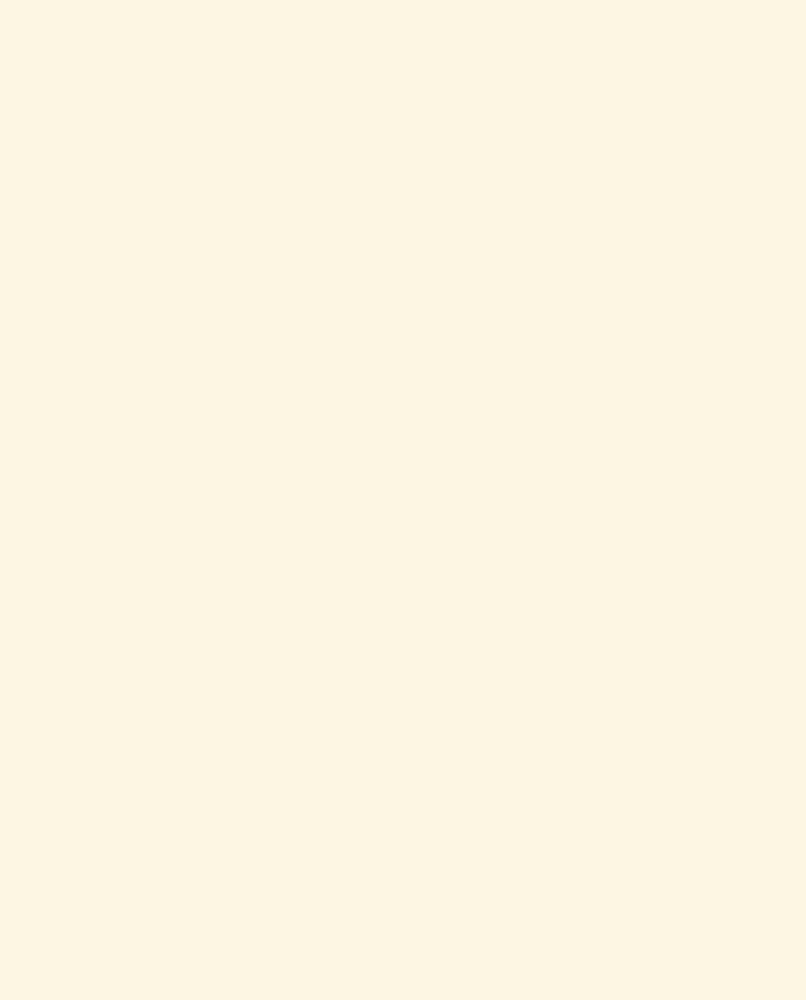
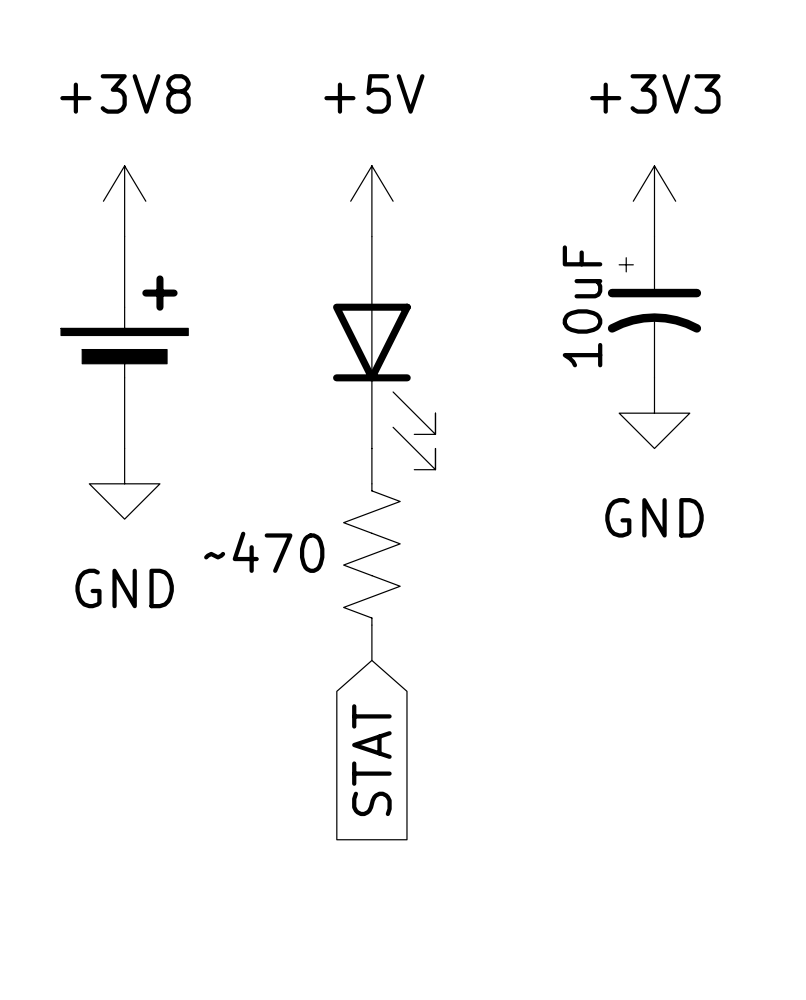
power symbol: none -> +3V8 (124, 201)
power symbol: none -> +5V (371, 201)
power symbol: none -> +3V3 (654, 201)
part: none -> (654, 307)
part: none -> (124, 342)
part: none -> (384, 353)
power symbol: none -> GND (654, 413)
power symbol: none -> GND (124, 483)
part: none -> (371, 554)
global label: none -> STAT (371, 760)

